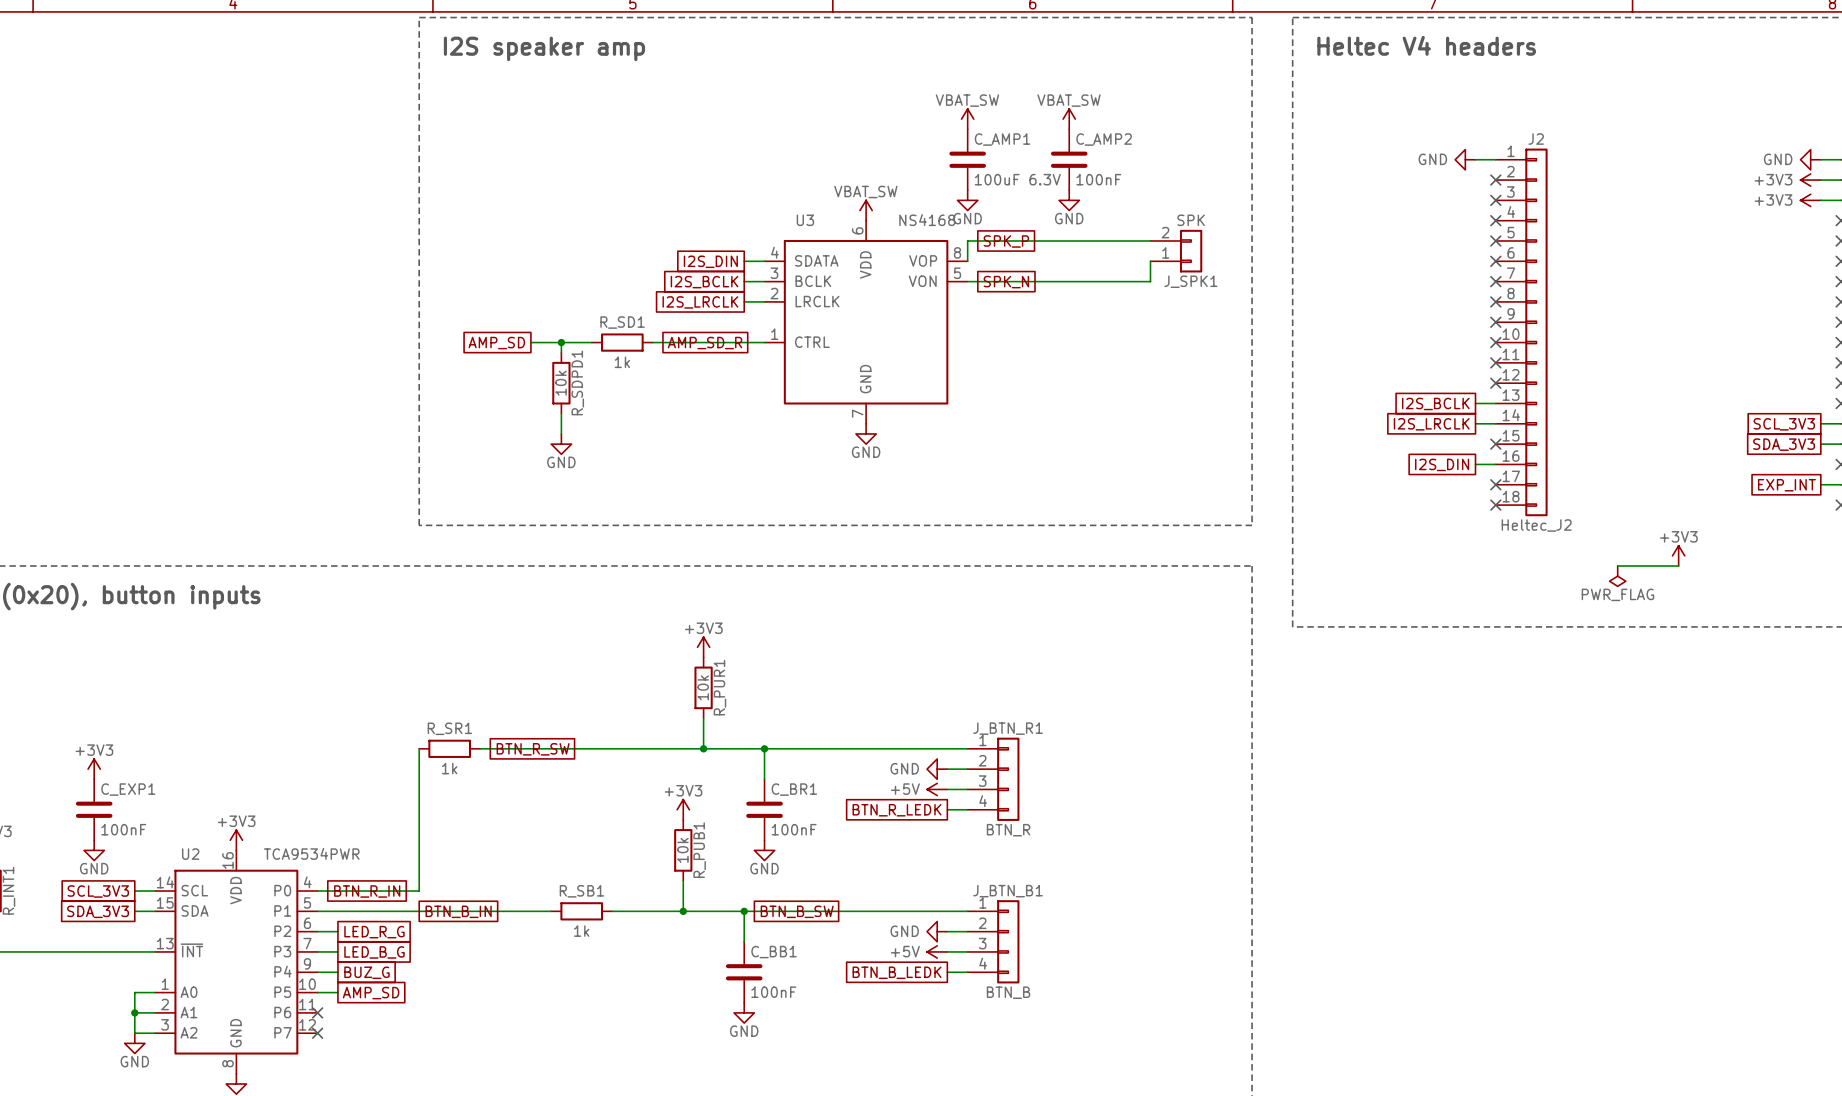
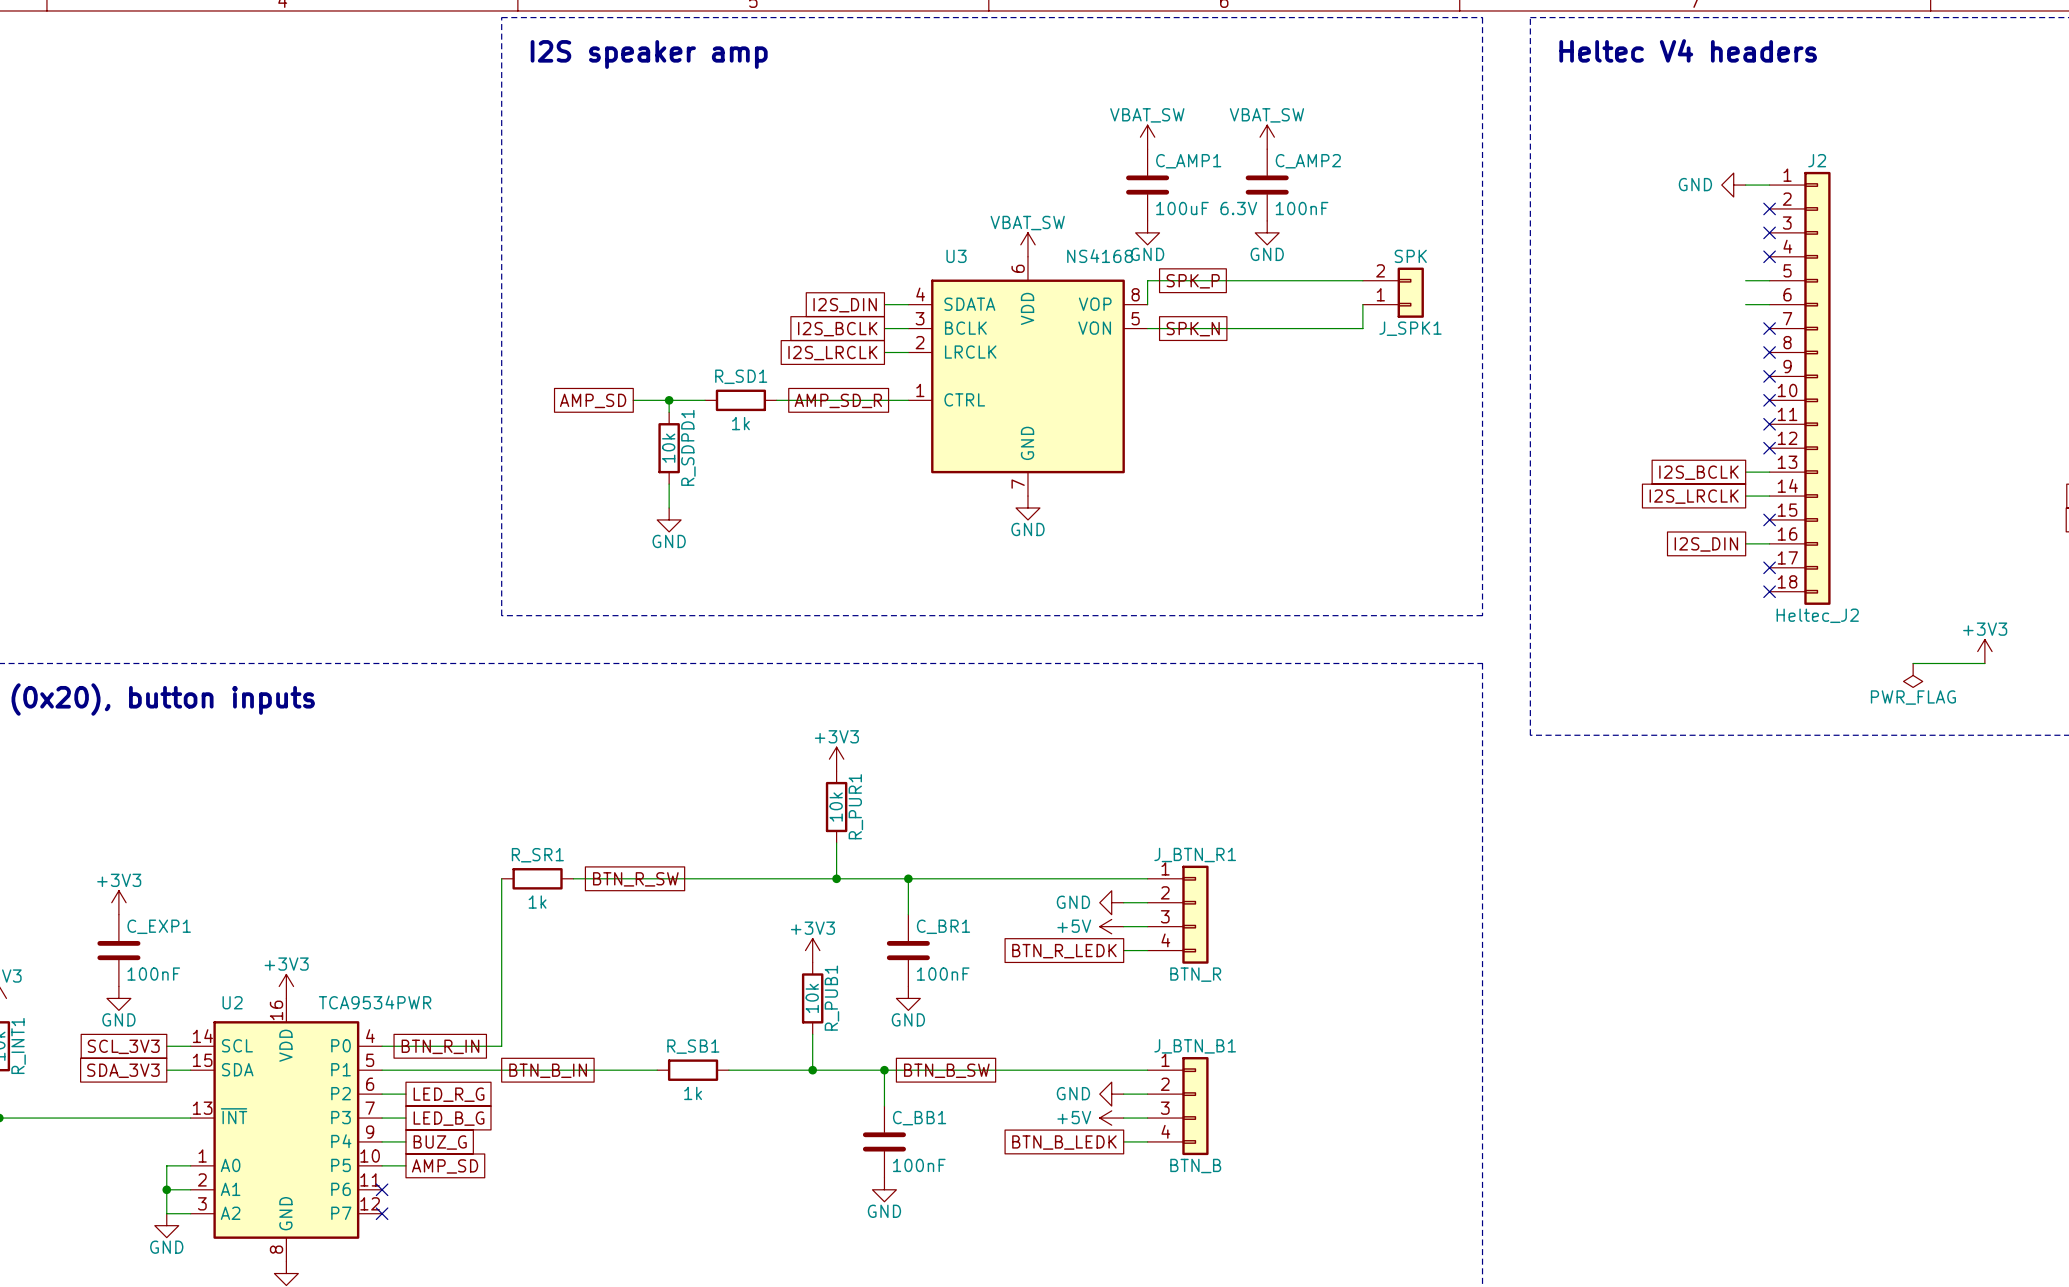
wire: none -> (1745, 280) (1769, 280)
no-connect mark: (1495, 240) -> none
wire: none -> (1745, 304) (1769, 304)
no-connect mark: (1495, 261) -> none

